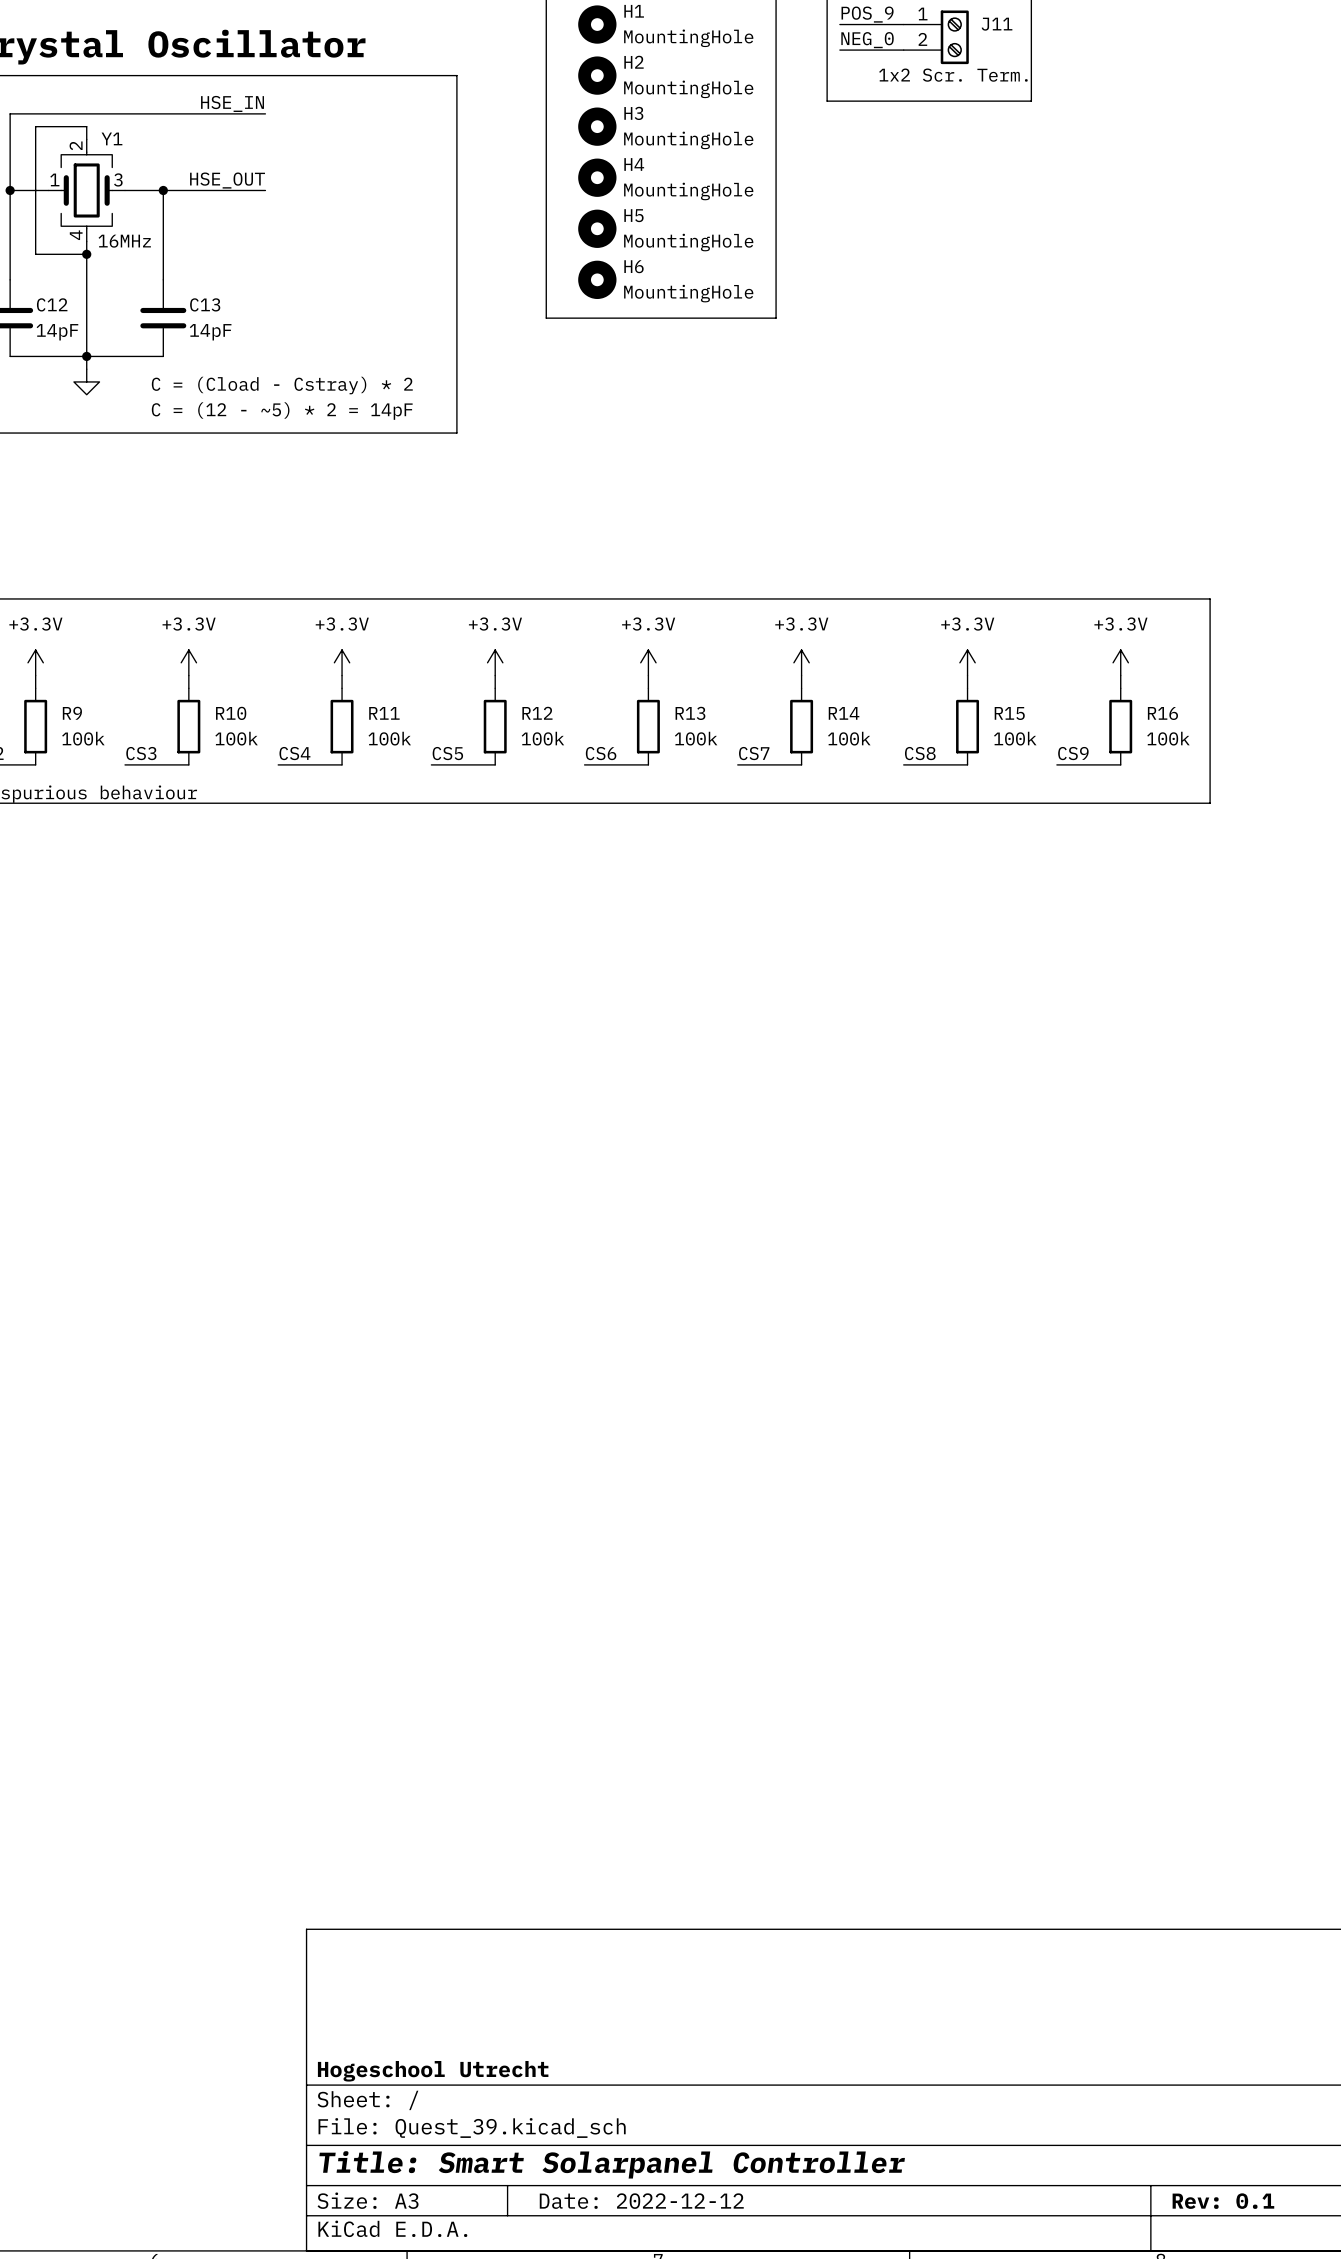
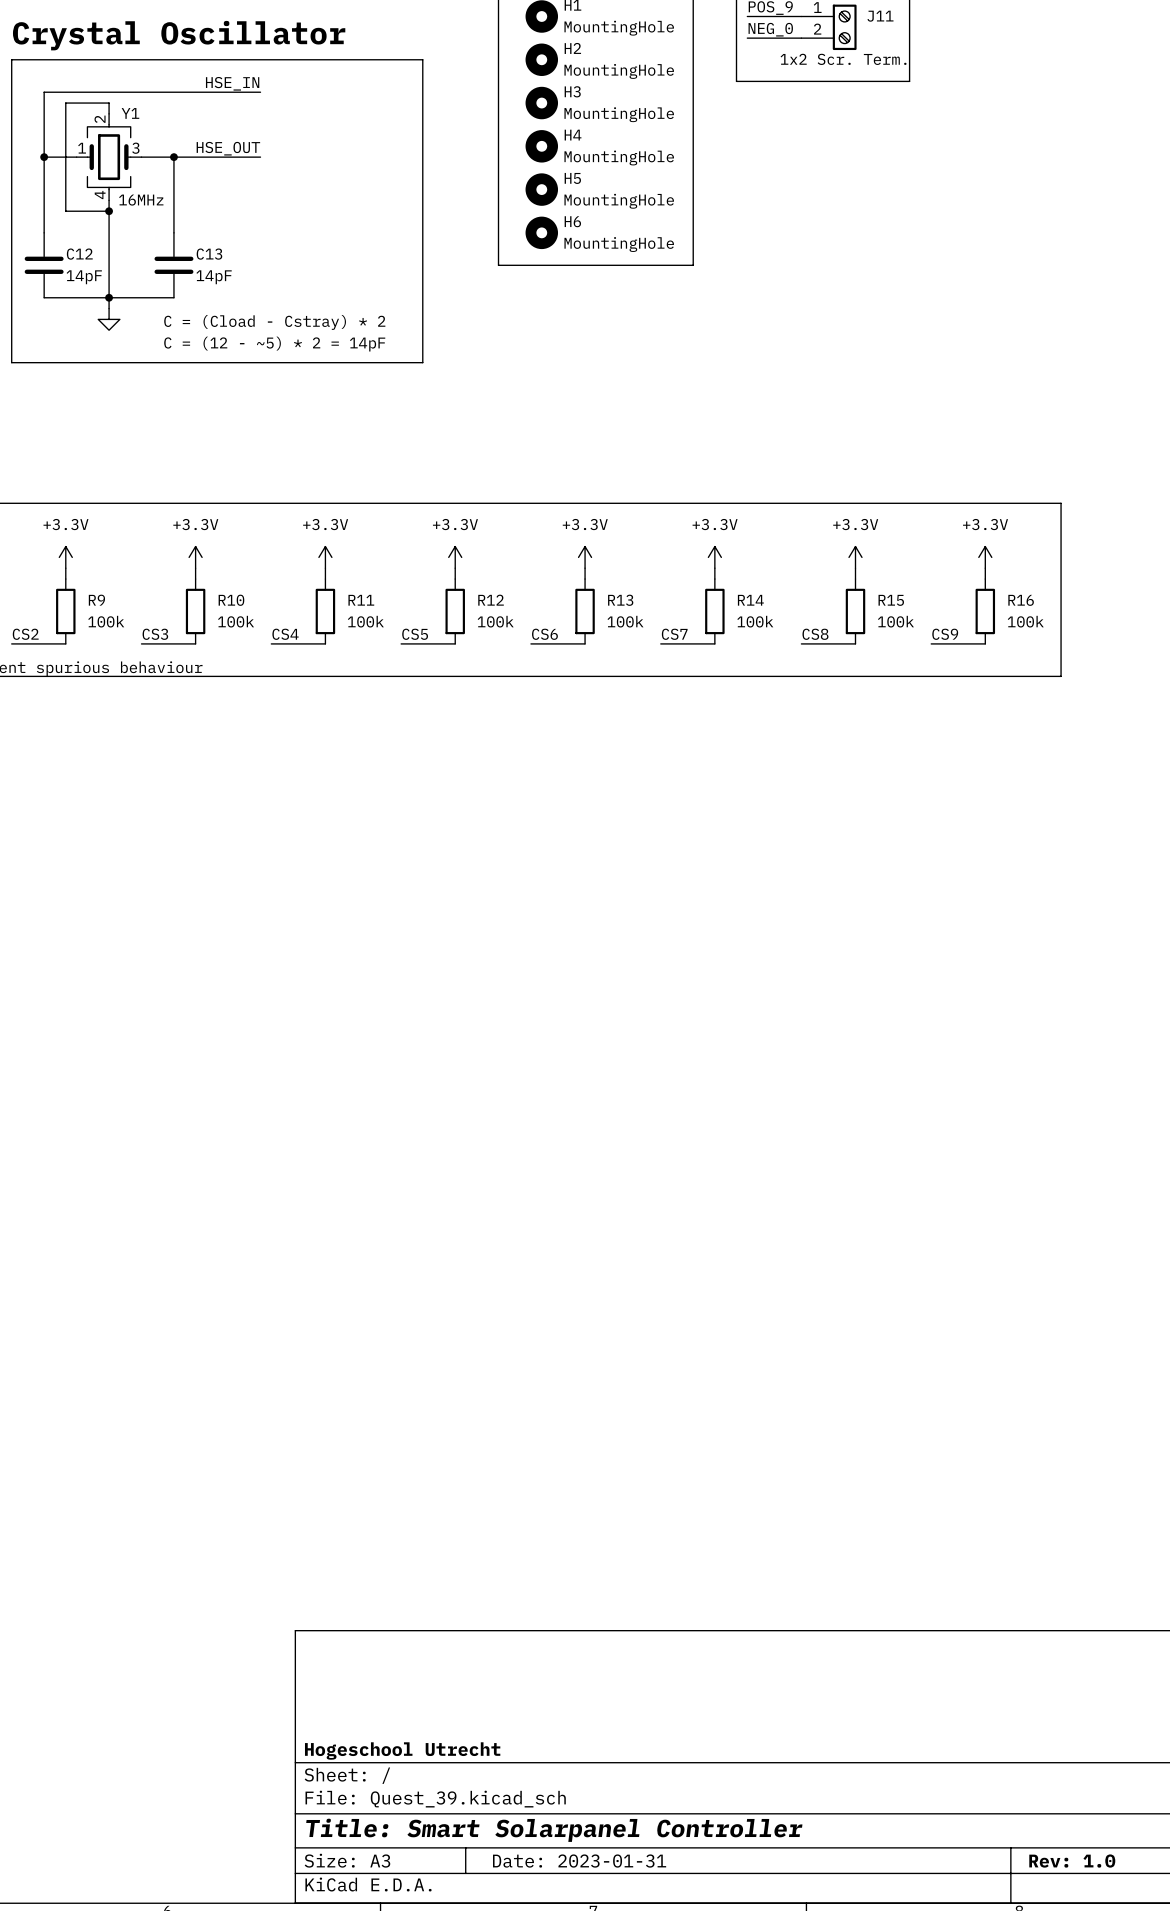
title block: Date: 2022-12-12 (641, 2201) -> Date: 2023-01-31 (579, 1861)
title block: Rev: 0.1 (1223, 2201) -> Rev: 1.0 (1072, 1861)

